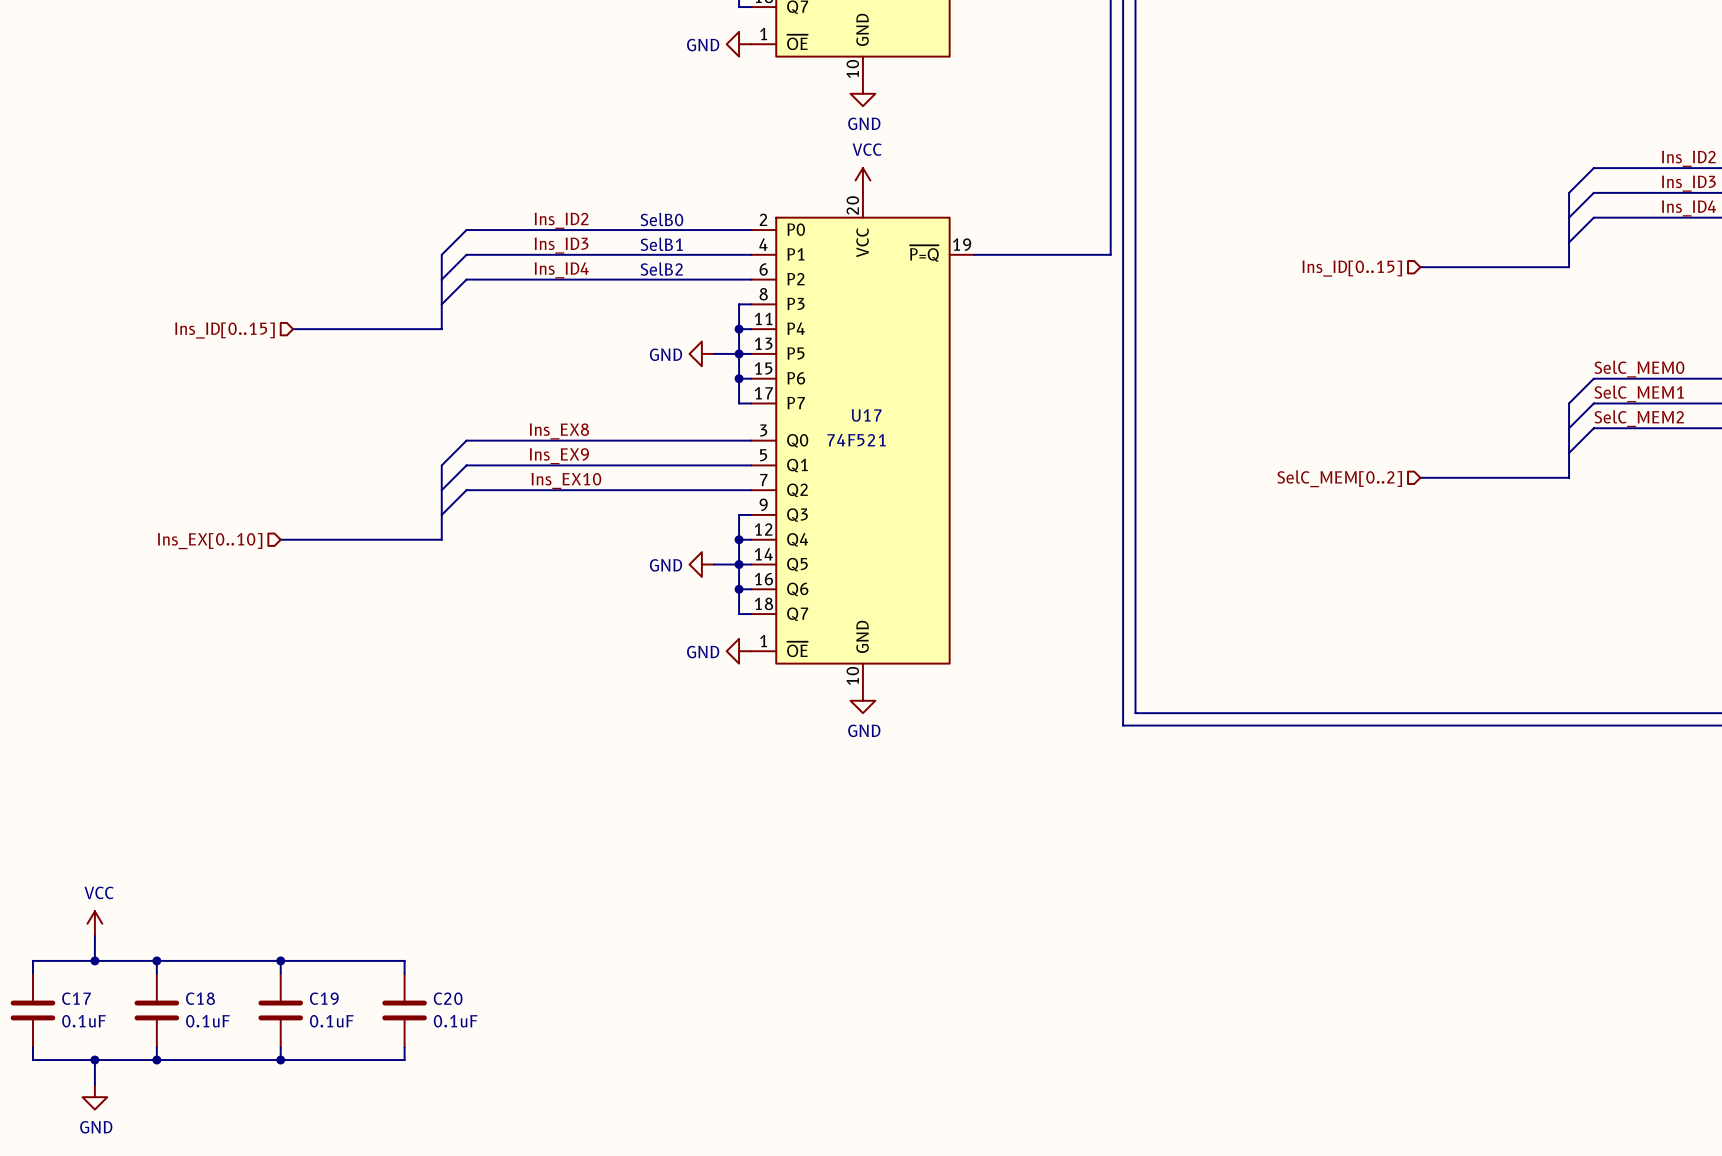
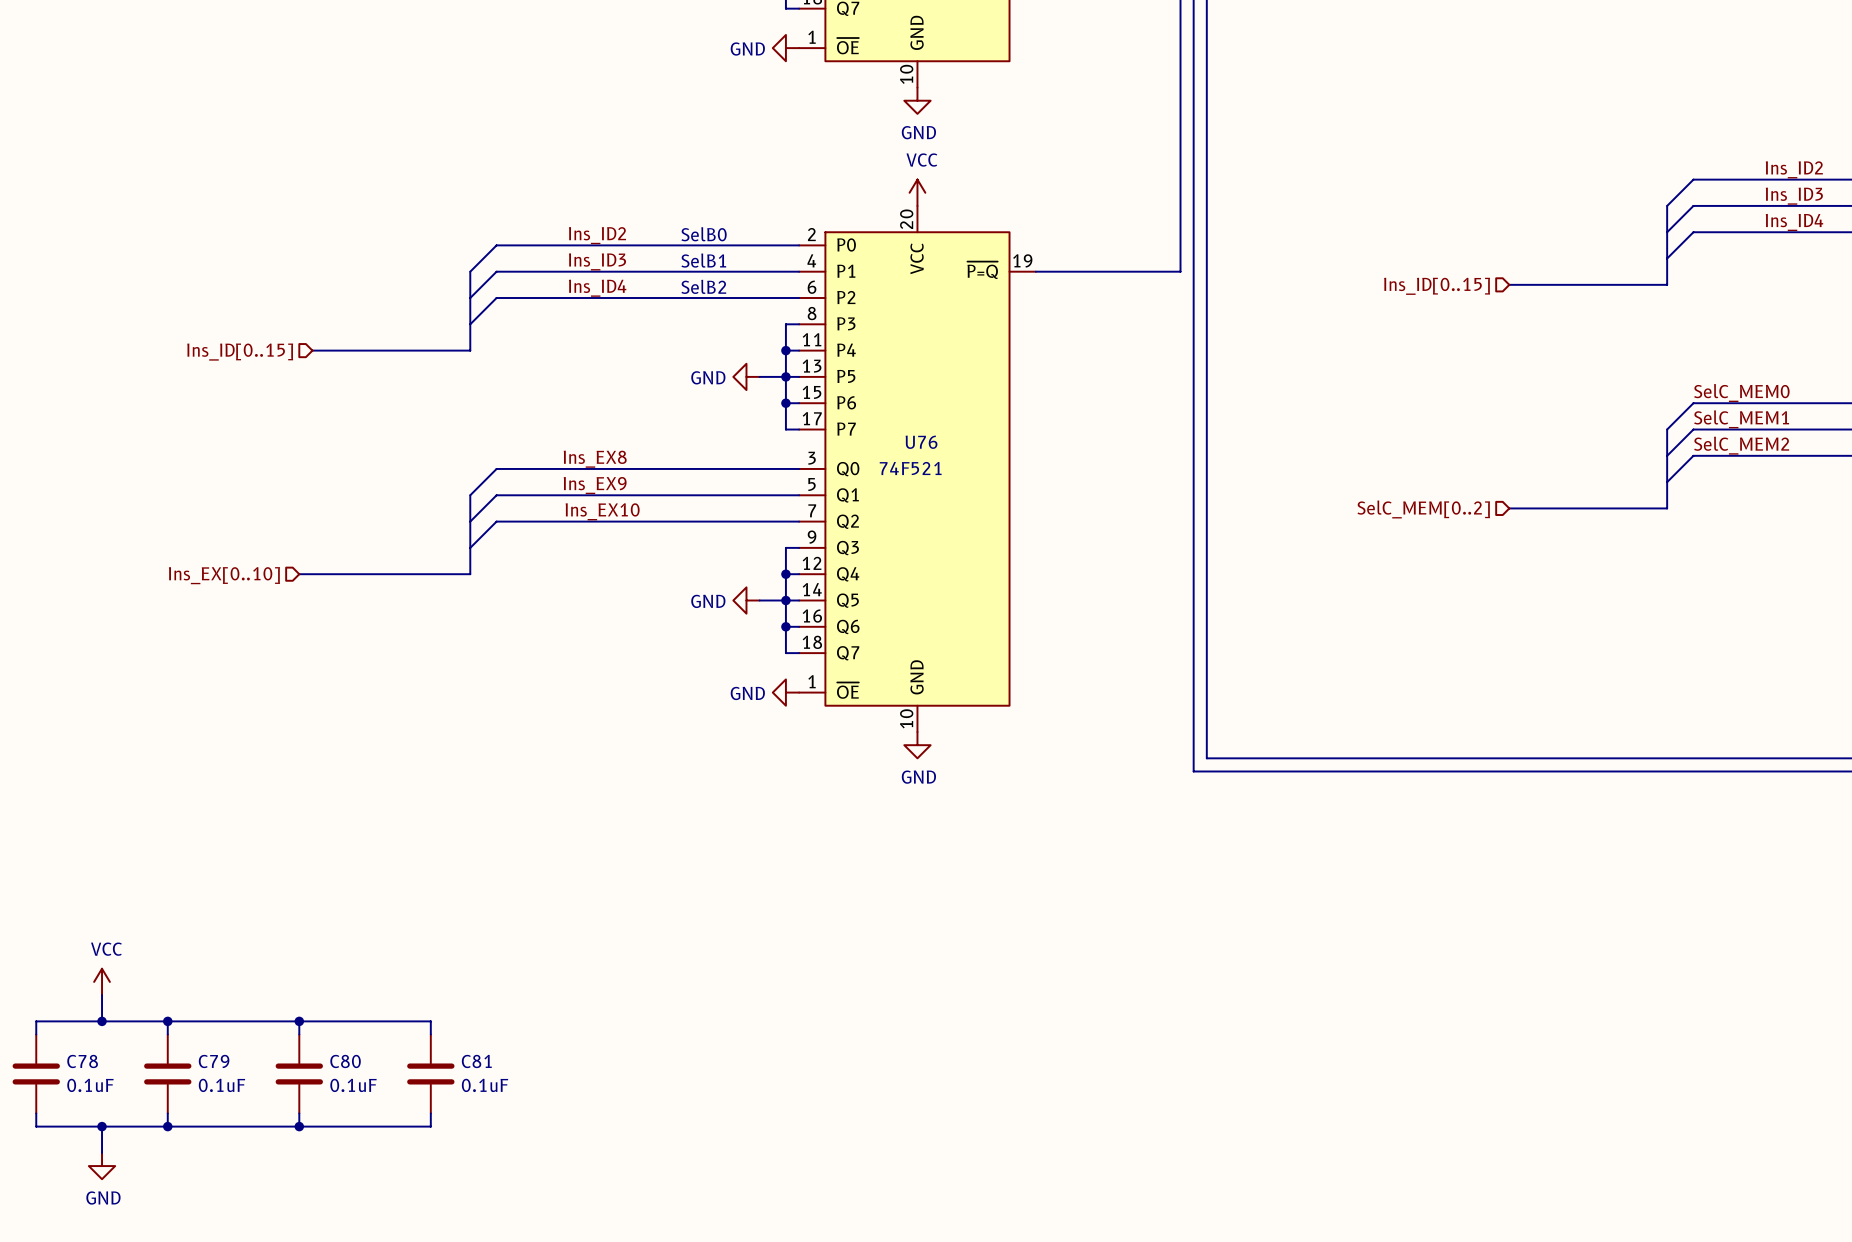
U17 name: U17 (866, 415) -> U76 (921, 442)
C17 name: C17 (76, 998) -> C78 (82, 1061)
C18 name: C18 (200, 998) -> C79 (214, 1061)
C19 name: C19 (324, 998) -> C80 (345, 1061)
C20 name: C20 (448, 998) -> C81 (476, 1061)

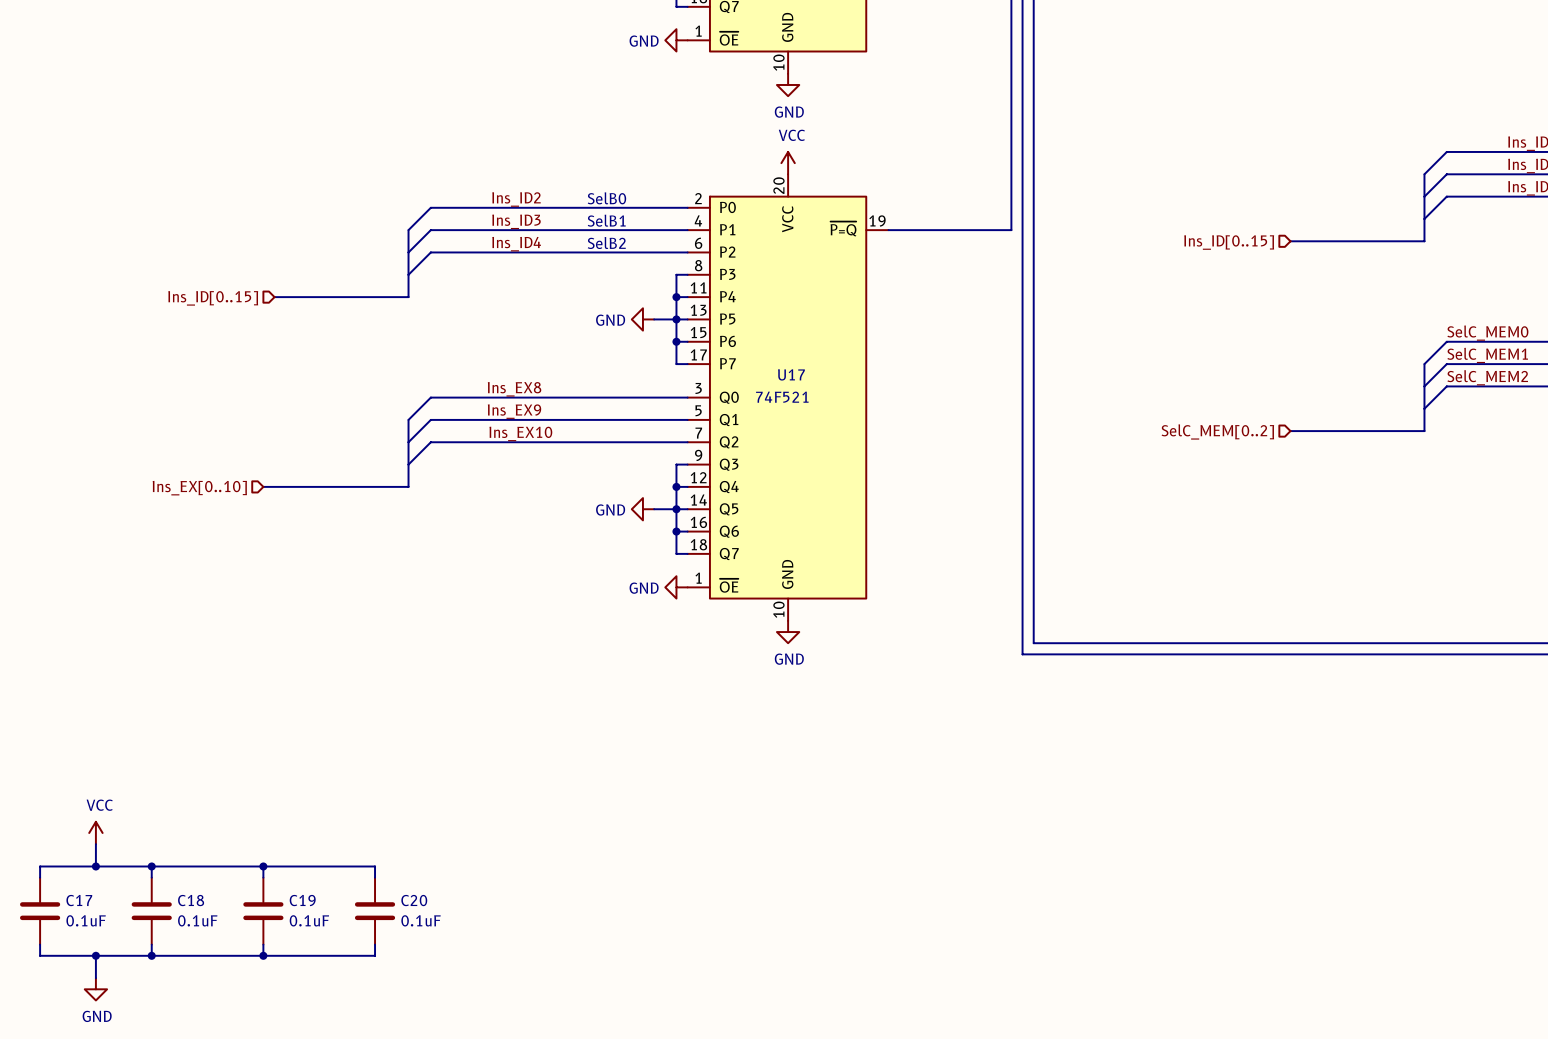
U76 name: U76 (921, 442) -> U17 (791, 374)
C78 name: C78 (82, 1061) -> C17 (79, 900)
C79 name: C79 (214, 1061) -> C18 (191, 900)
C80 name: C80 (345, 1061) -> C19 (302, 900)
C81 name: C81 (476, 1061) -> C20 (414, 900)

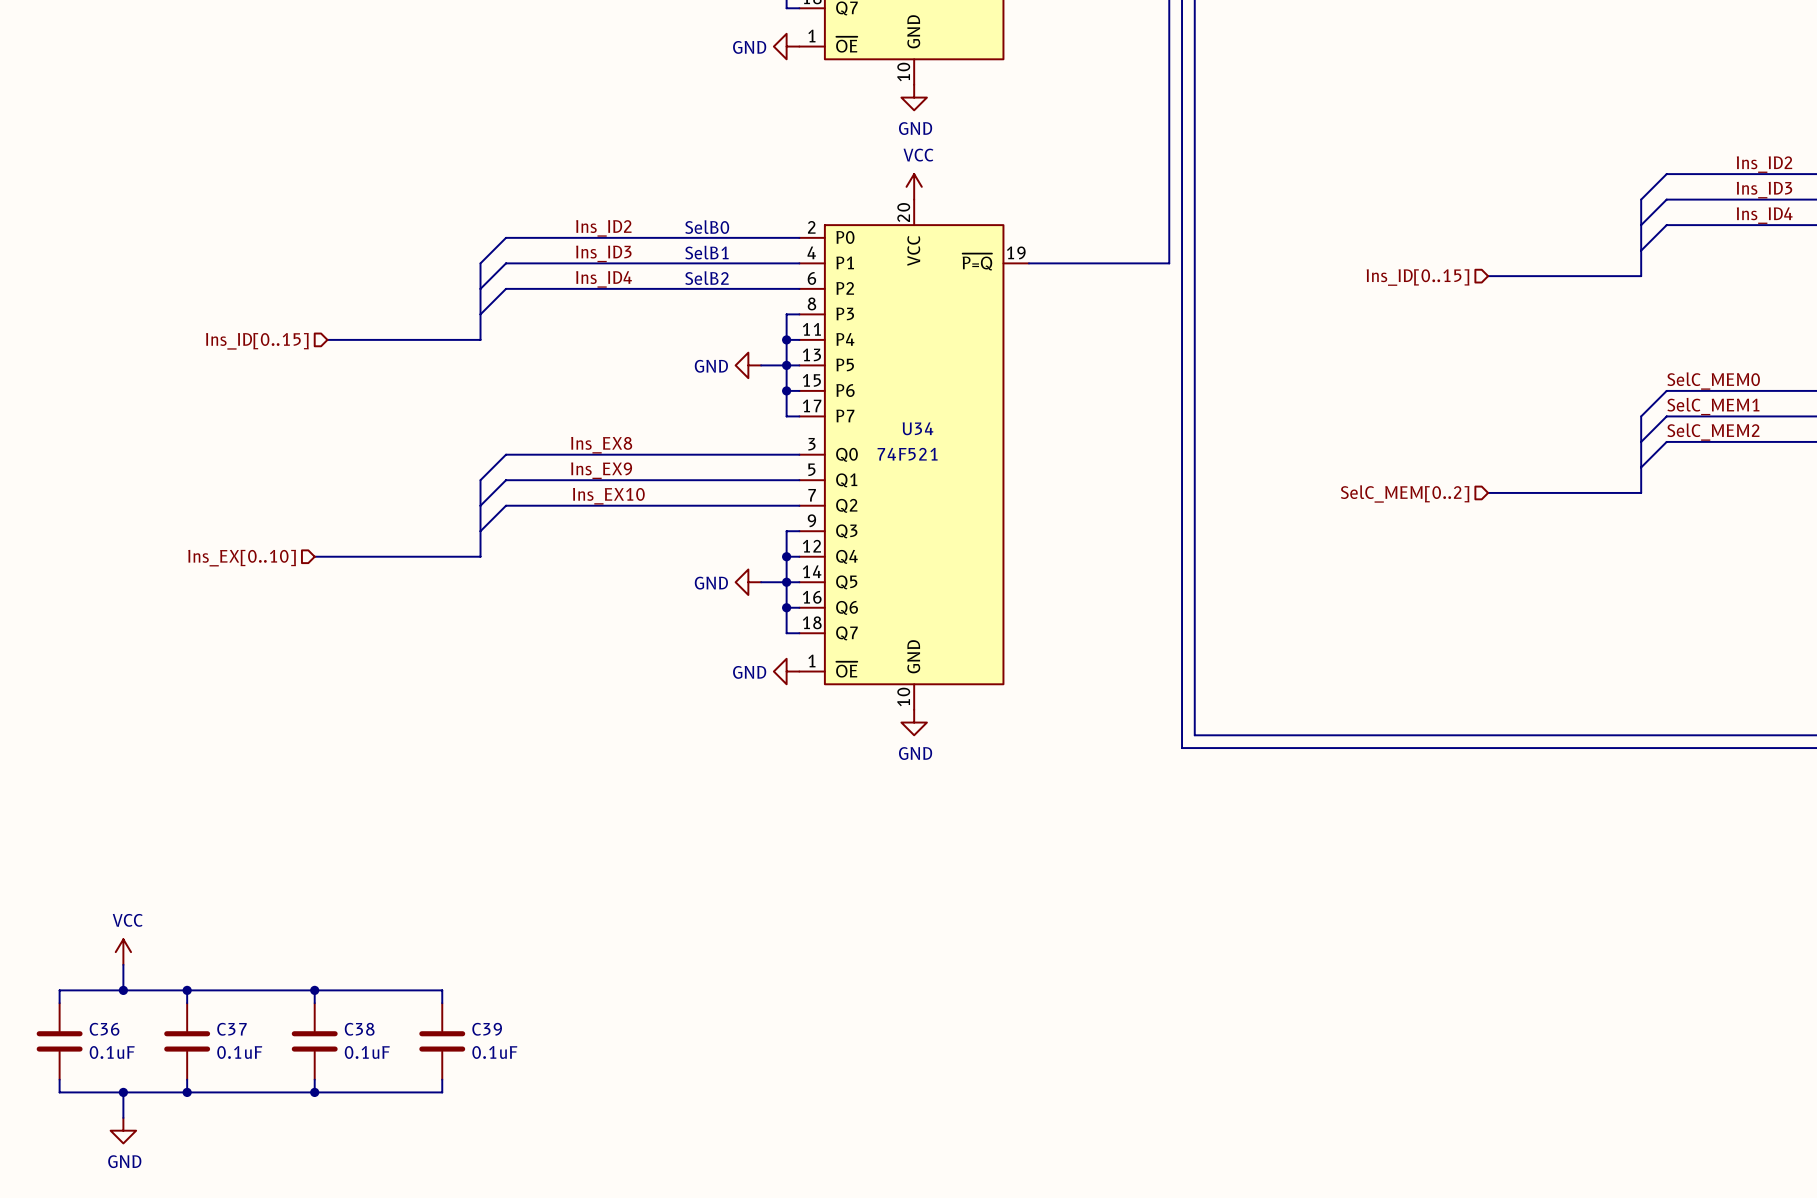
U17 name: U17 (791, 374) -> U34 (917, 428)
C17 name: C17 (79, 900) -> C36 (104, 1029)
C18 name: C18 (191, 900) -> C37 (231, 1029)
C19 name: C19 (302, 900) -> C38 (359, 1029)
C20 name: C20 (414, 900) -> C39 (487, 1029)

